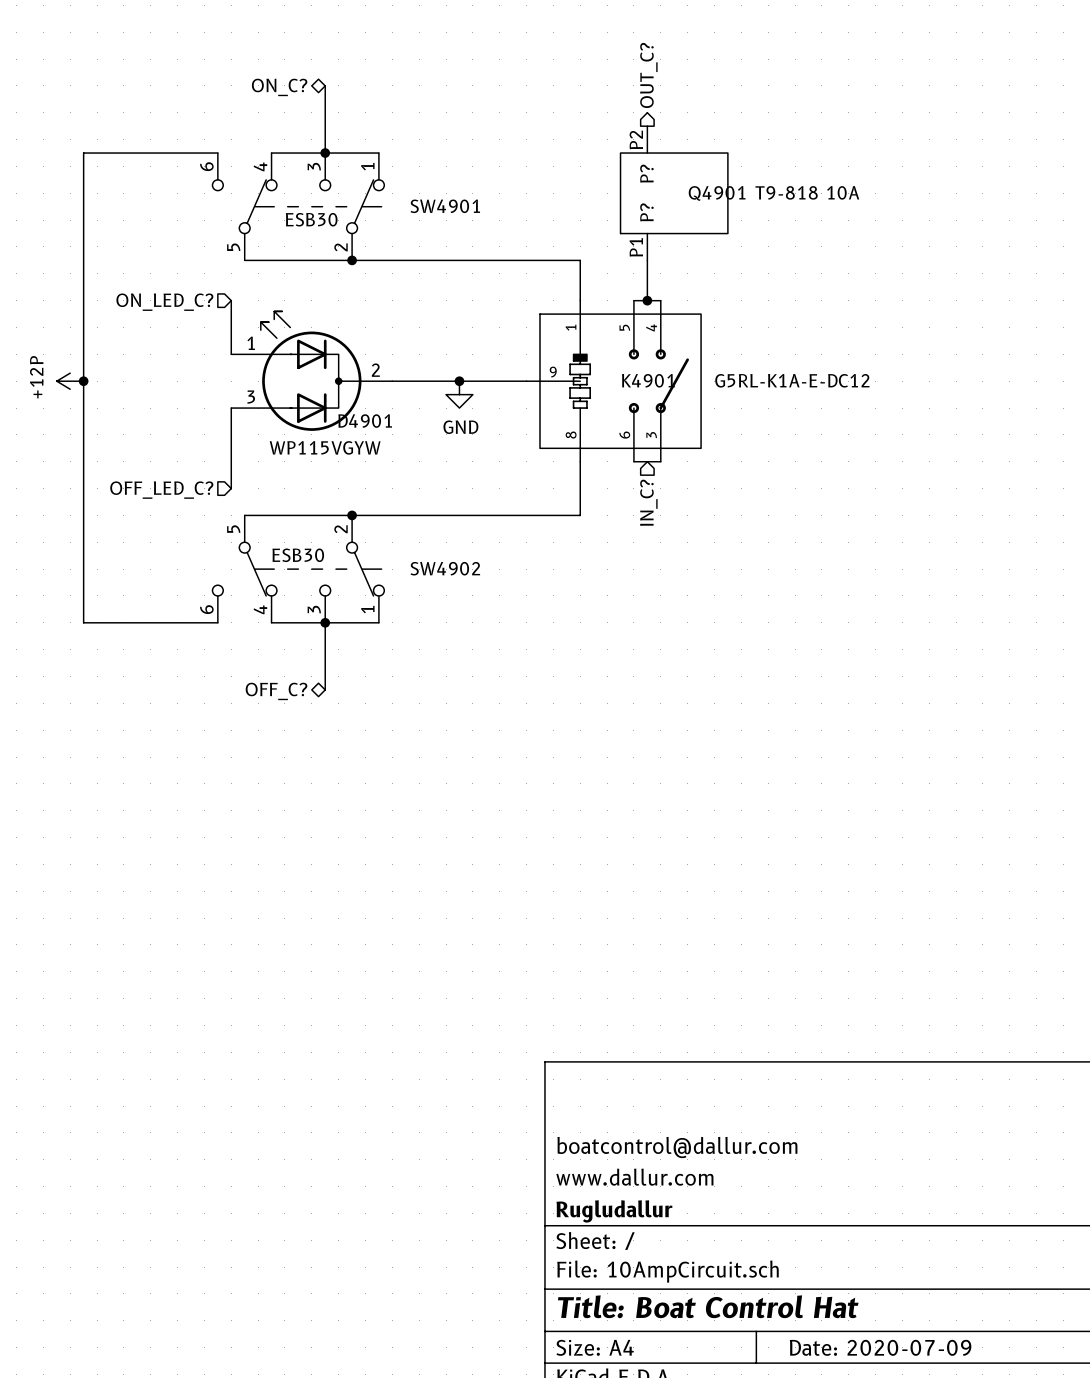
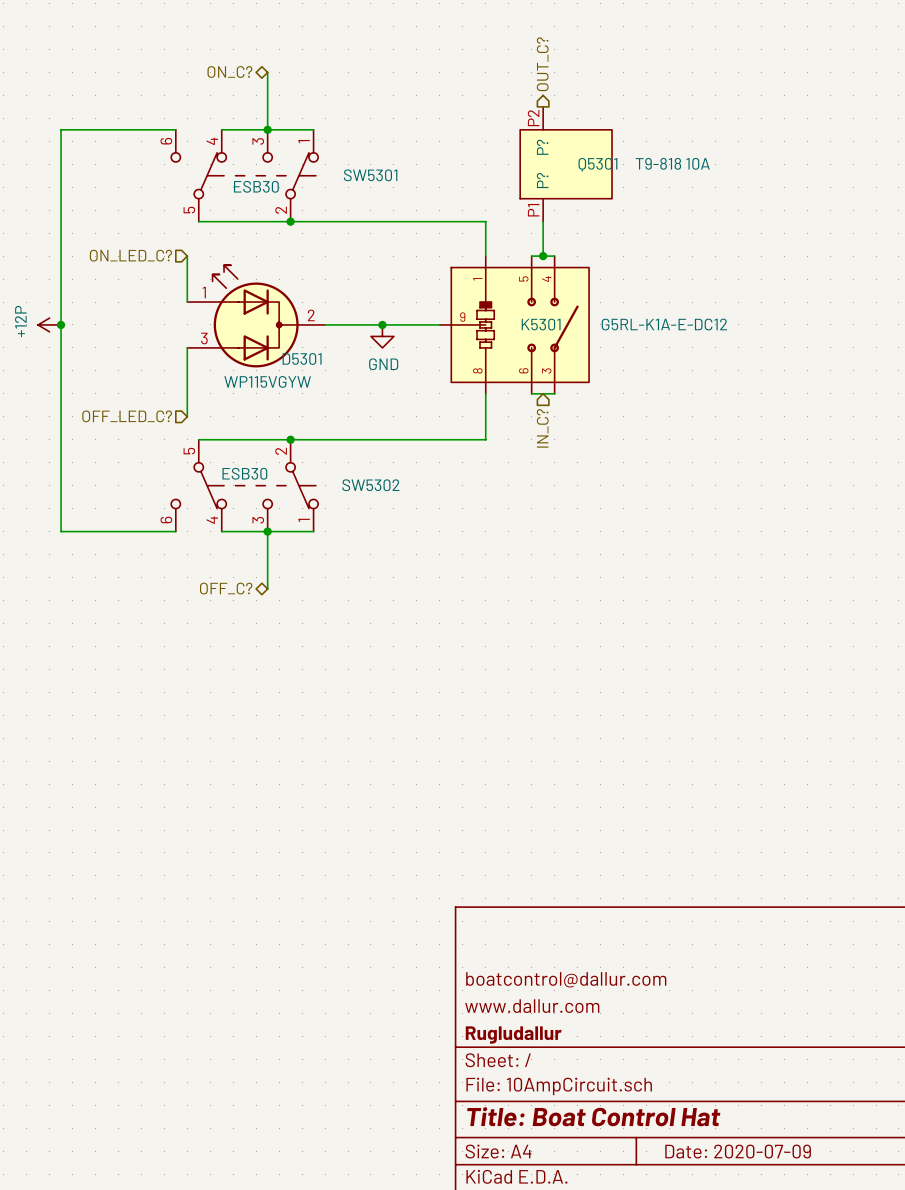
Q4901 name: Q4901 (717, 193) -> Q5301 (597, 164)
SW4901 name: SW4901 (445, 206) -> SW5301 (370, 175)
K4901 name: K4901 (648, 380) -> K5301 (541, 324)
D4901 name: D4901 (365, 421) -> D5301 (302, 358)
SW4902 name: SW4902 (445, 568) -> SW5302 (370, 485)

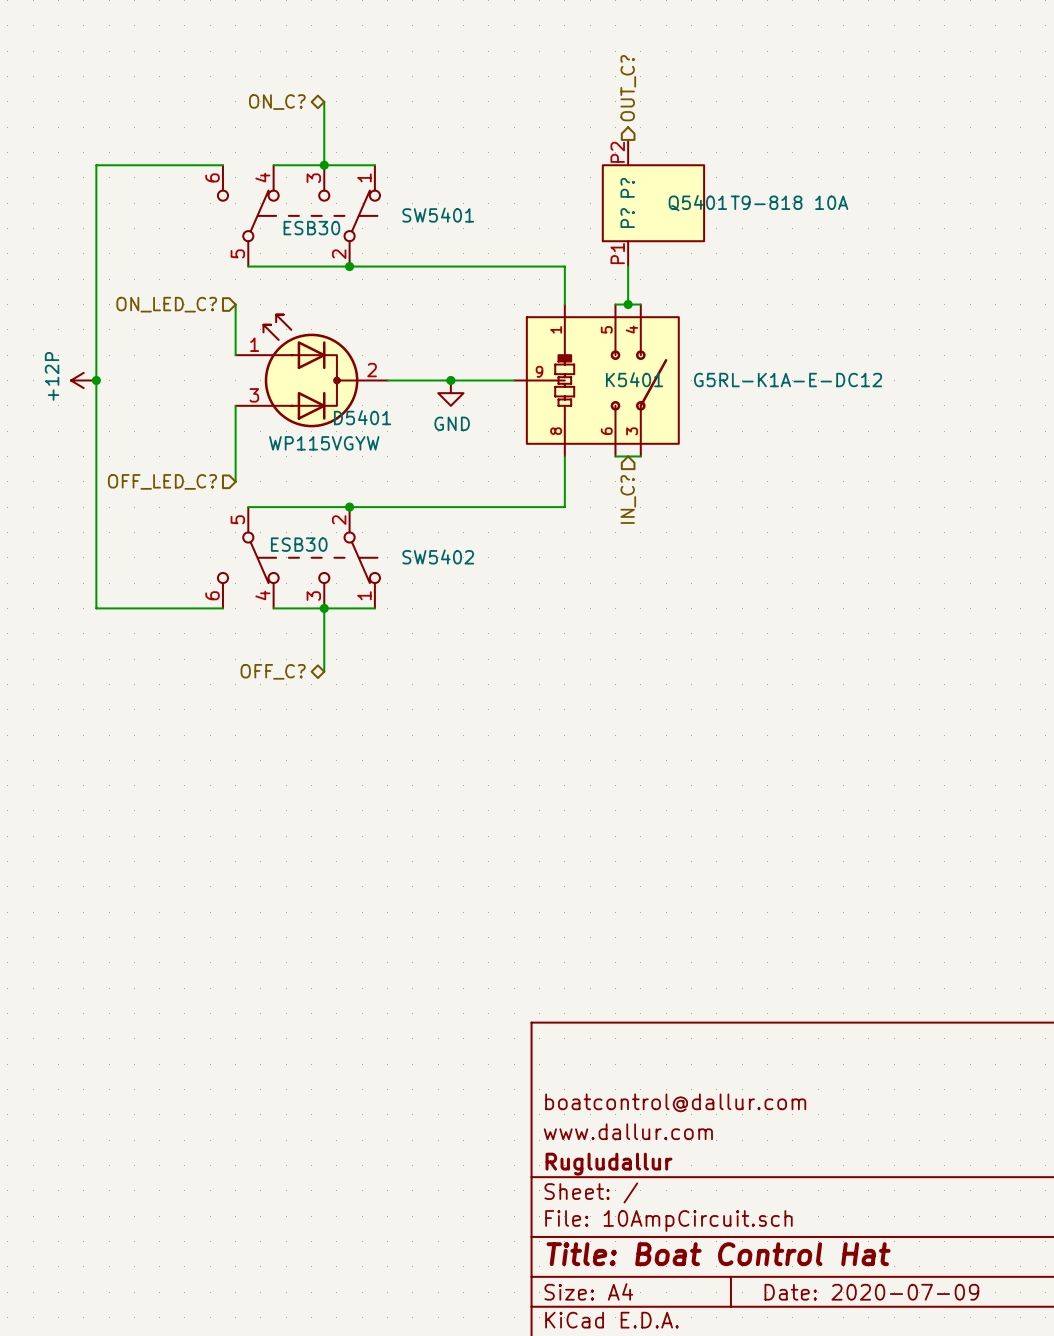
Q5301 name: Q5301 (597, 164) -> Q5401 (697, 203)
SW5301 name: SW5301 (370, 175) -> SW5401 (438, 215)
K5301 name: K5301 (541, 324) -> K5401 (634, 379)
D5301 name: D5301 (302, 358) -> D5401 (362, 417)
SW5302 name: SW5302 (370, 485) -> SW5402 (438, 556)

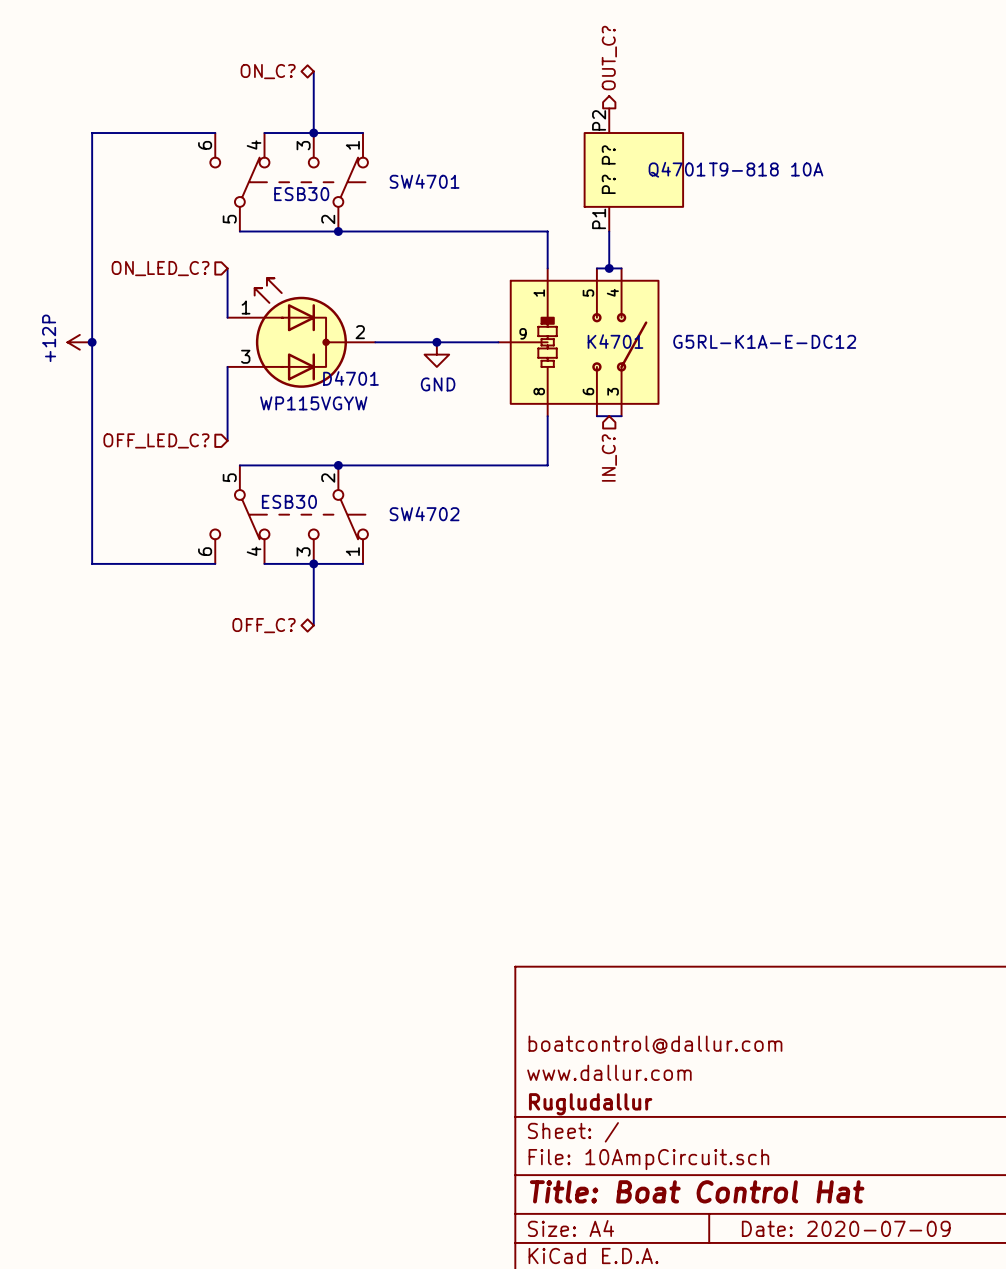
Q5401 name: Q5401 (697, 203) -> Q4701 (677, 169)
SW5401 name: SW5401 (438, 215) -> SW4701 (424, 181)
K5401 name: K5401 (634, 379) -> K4701 (615, 341)
D5401 name: D5401 (362, 417) -> D4701 (350, 378)
SW5402 name: SW5402 (438, 556) -> SW4702 (424, 513)

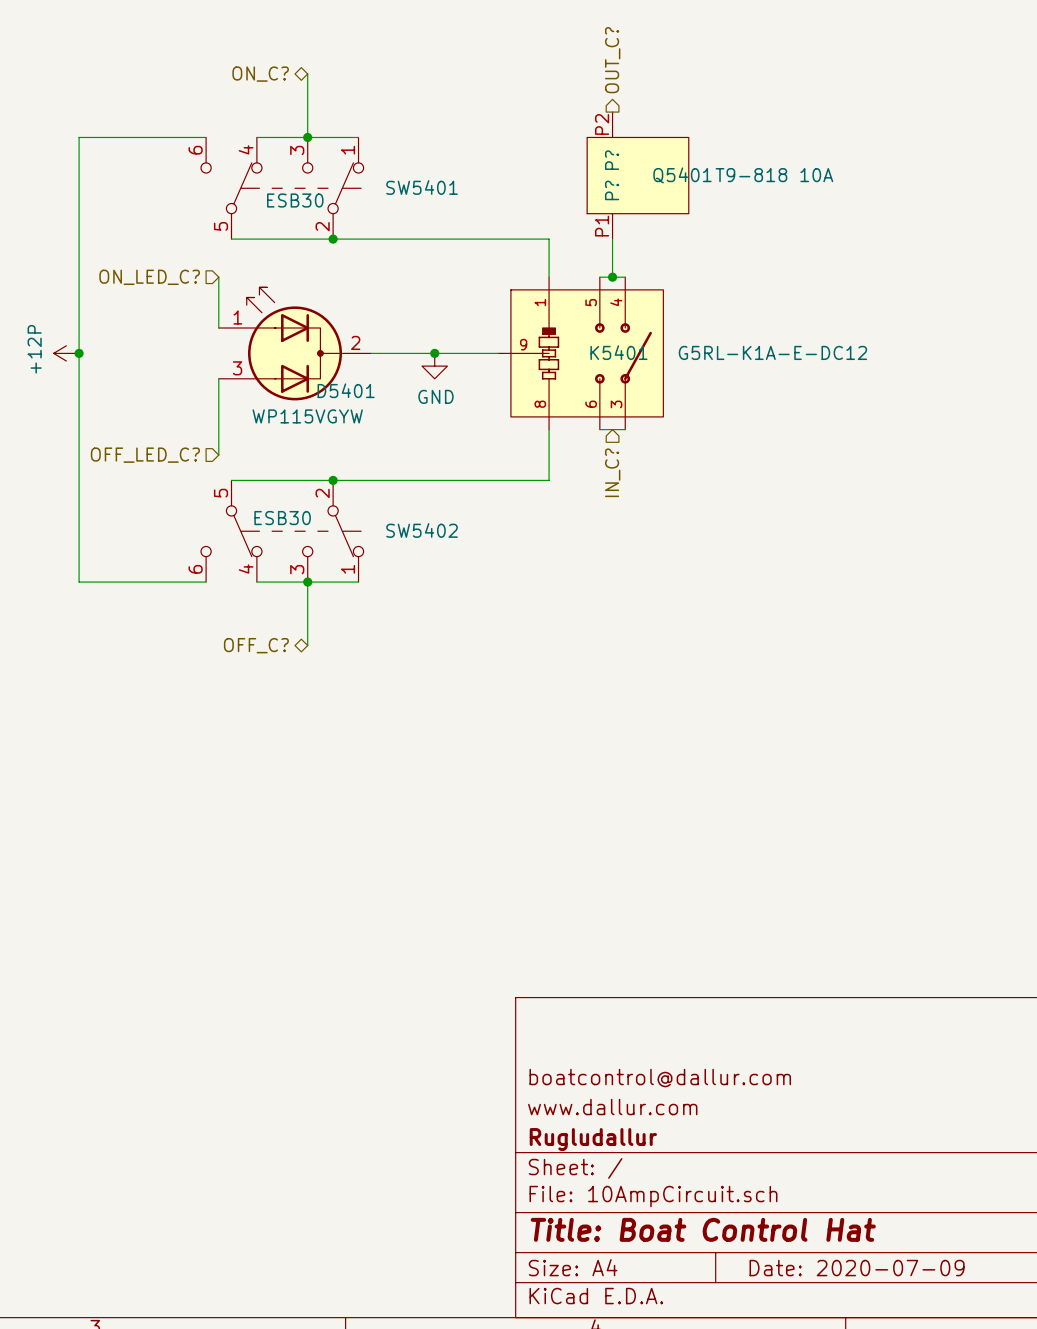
Q4701 name: Q4701 (677, 169) -> Q5401 (682, 175)
SW4701 name: SW4701 (424, 181) -> SW5401 (422, 187)
K4701 name: K4701 (615, 341) -> K5401 (619, 352)
D4701 name: D4701 (350, 378) -> D5401 (346, 390)
SW4702 name: SW4702 (424, 513) -> SW5402 (422, 530)

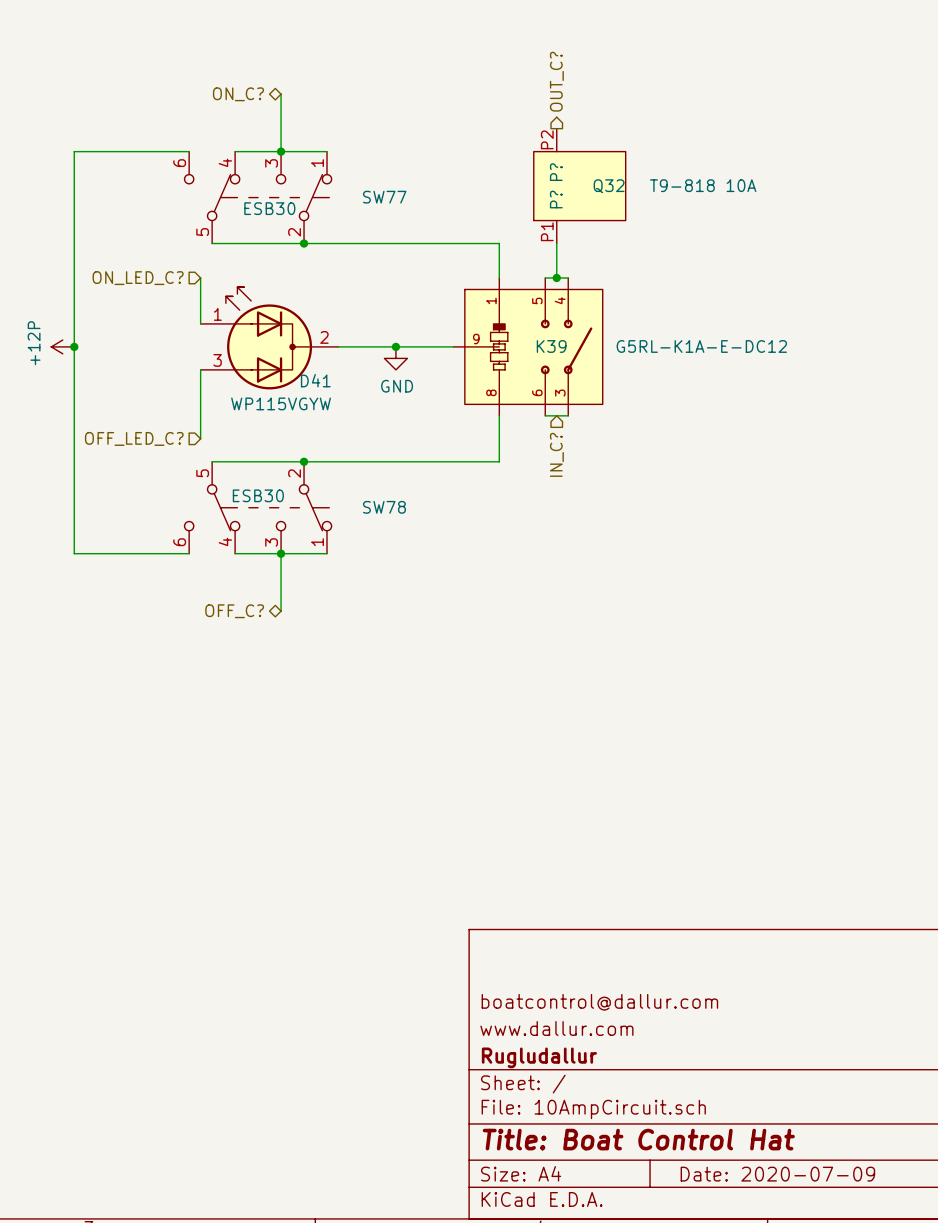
Q5401 name: Q5401 (682, 175) -> Q32 (609, 186)
SW5401 name: SW5401 (422, 187) -> SW77 (384, 197)
K5401 name: K5401 (619, 352) -> K39 (551, 346)
D5401 name: D5401 (346, 390) -> D41 (315, 380)
SW5402 name: SW5402 (422, 530) -> SW78 (384, 507)

